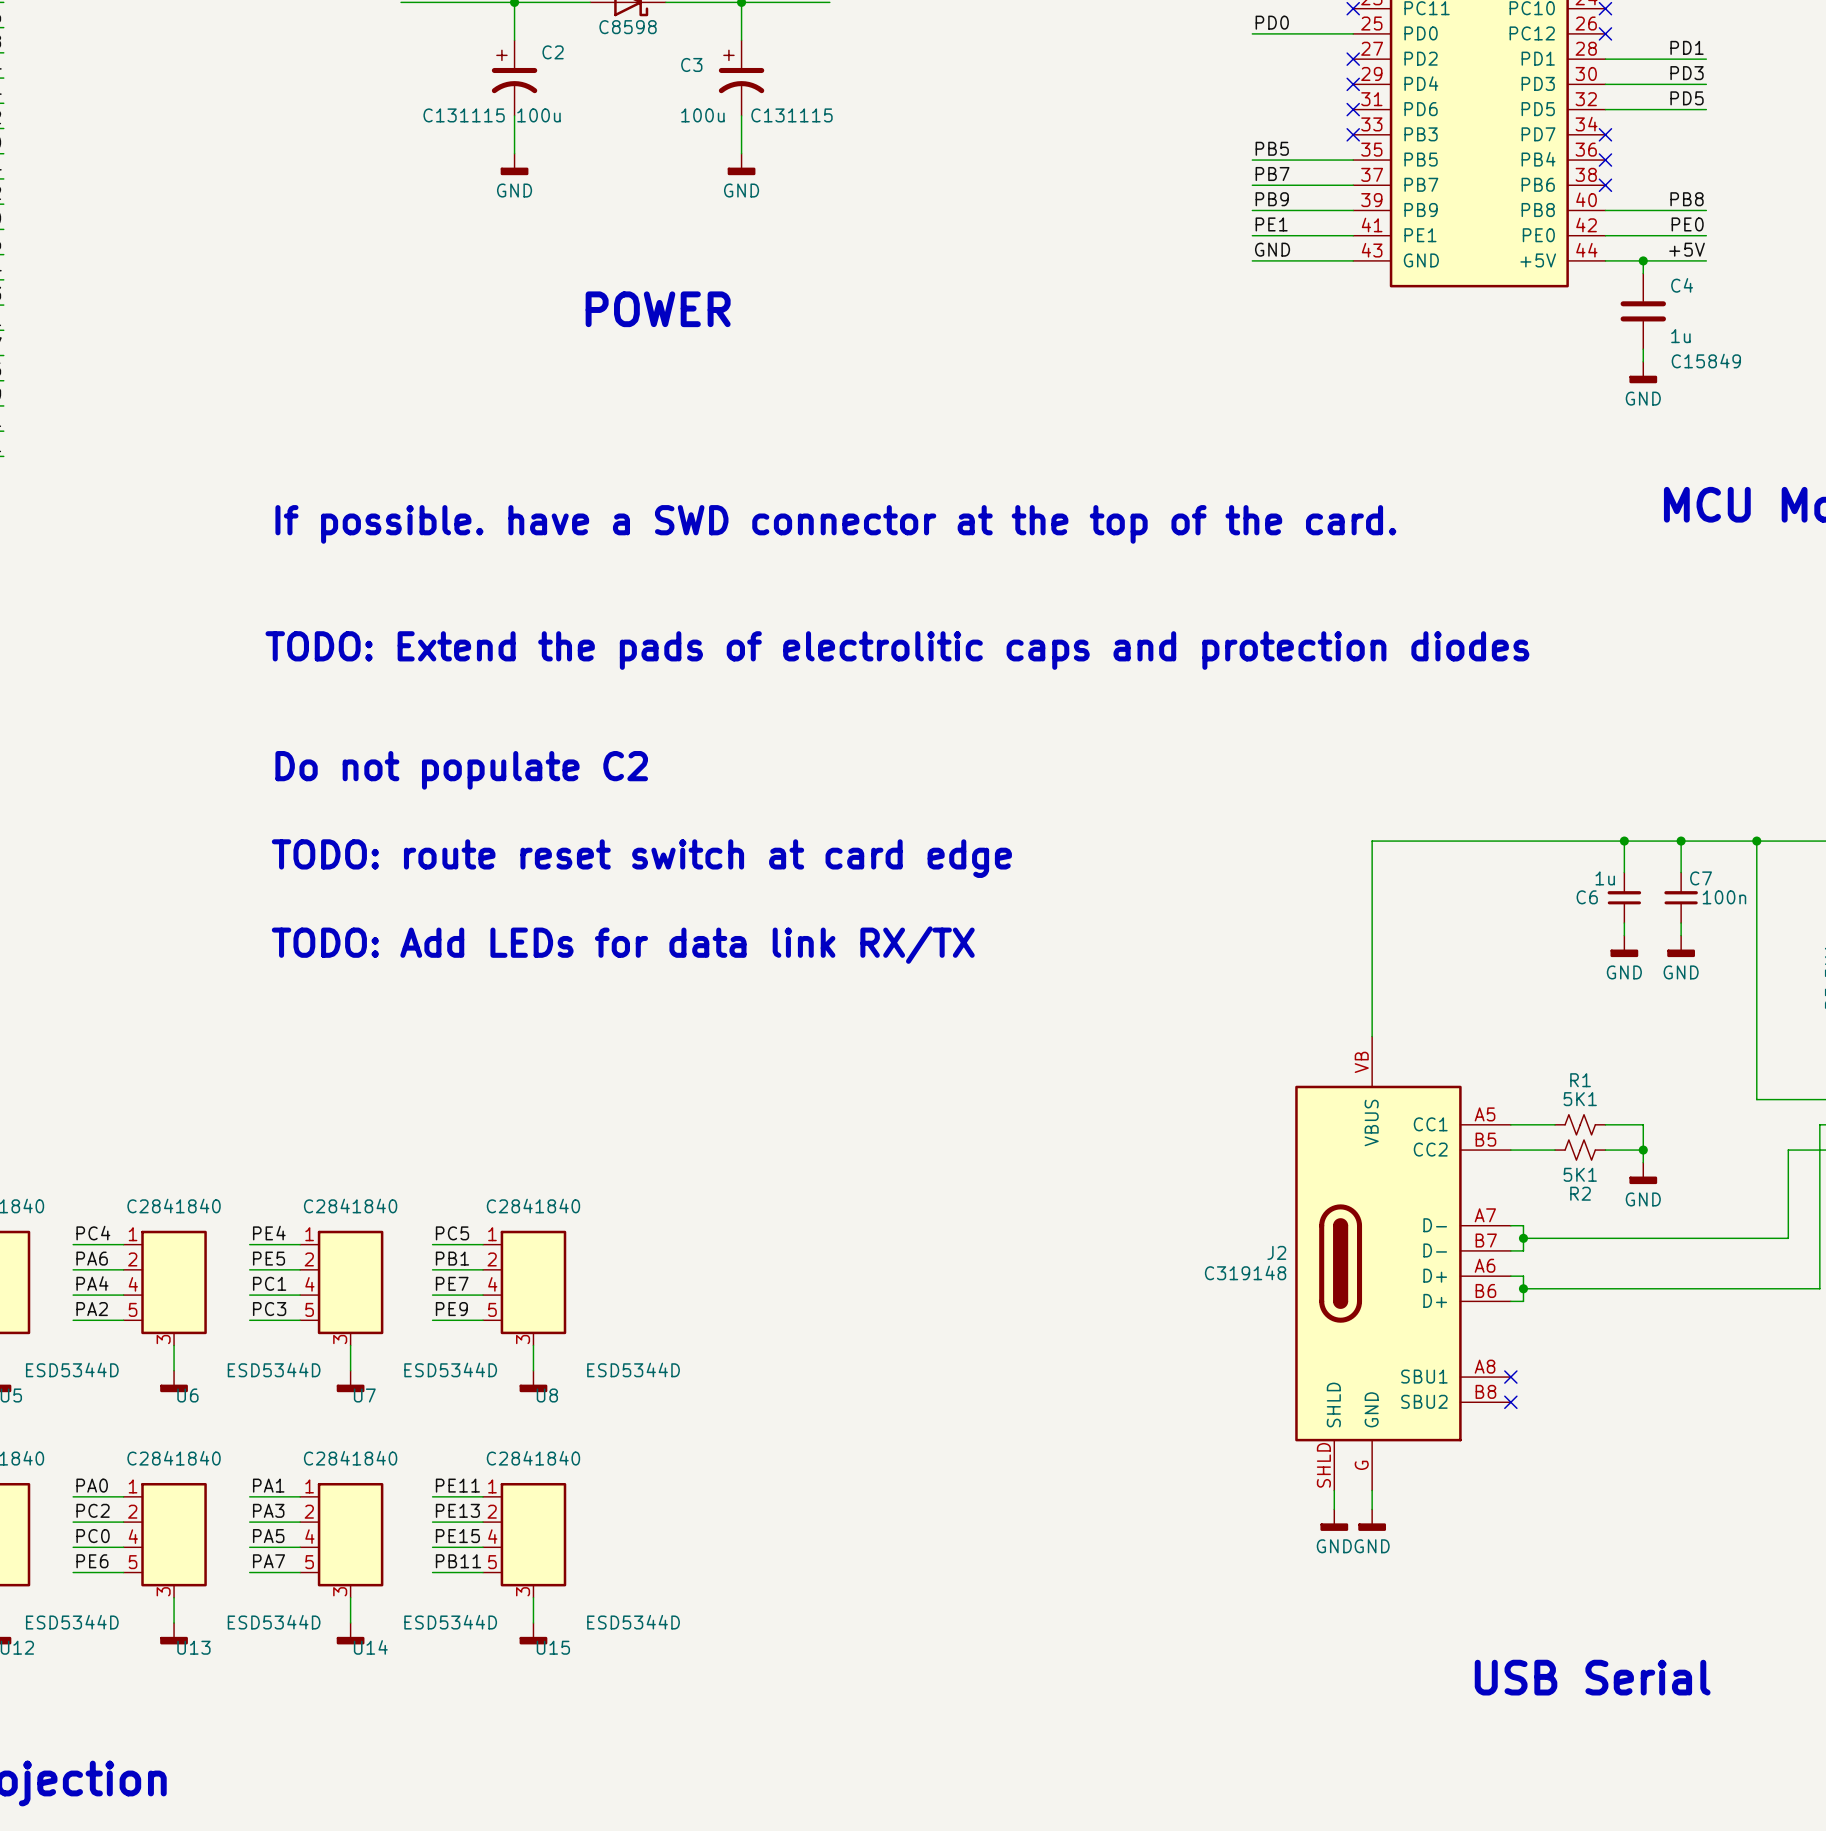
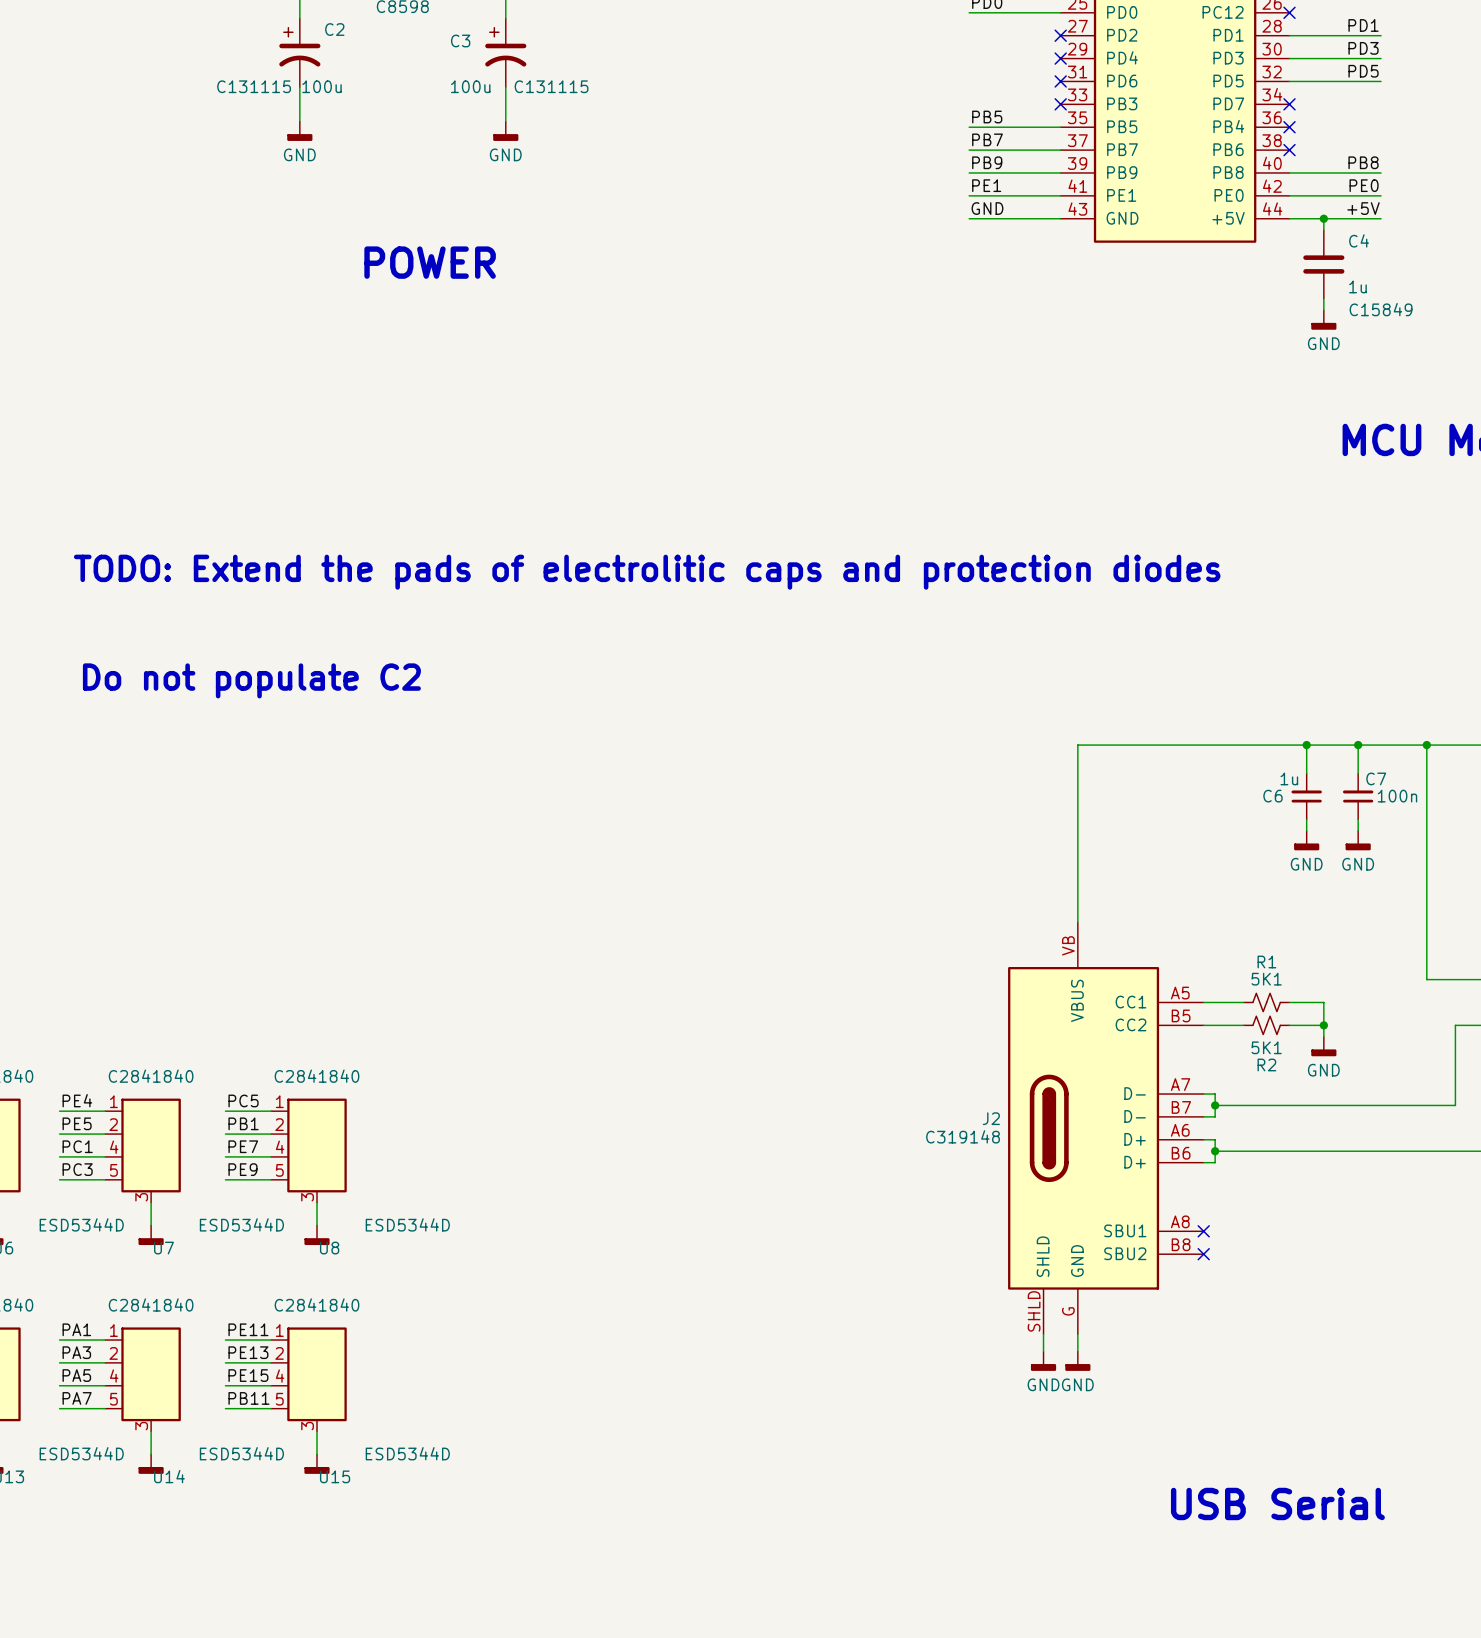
text: If possible. have a SWD connector at the top of the card. (835, 524) -> none
text: TODO: route reset switch at card edge (641, 858) -> none
text: TODO: Add LEDs for data link RX/TX (623, 945) -> none

